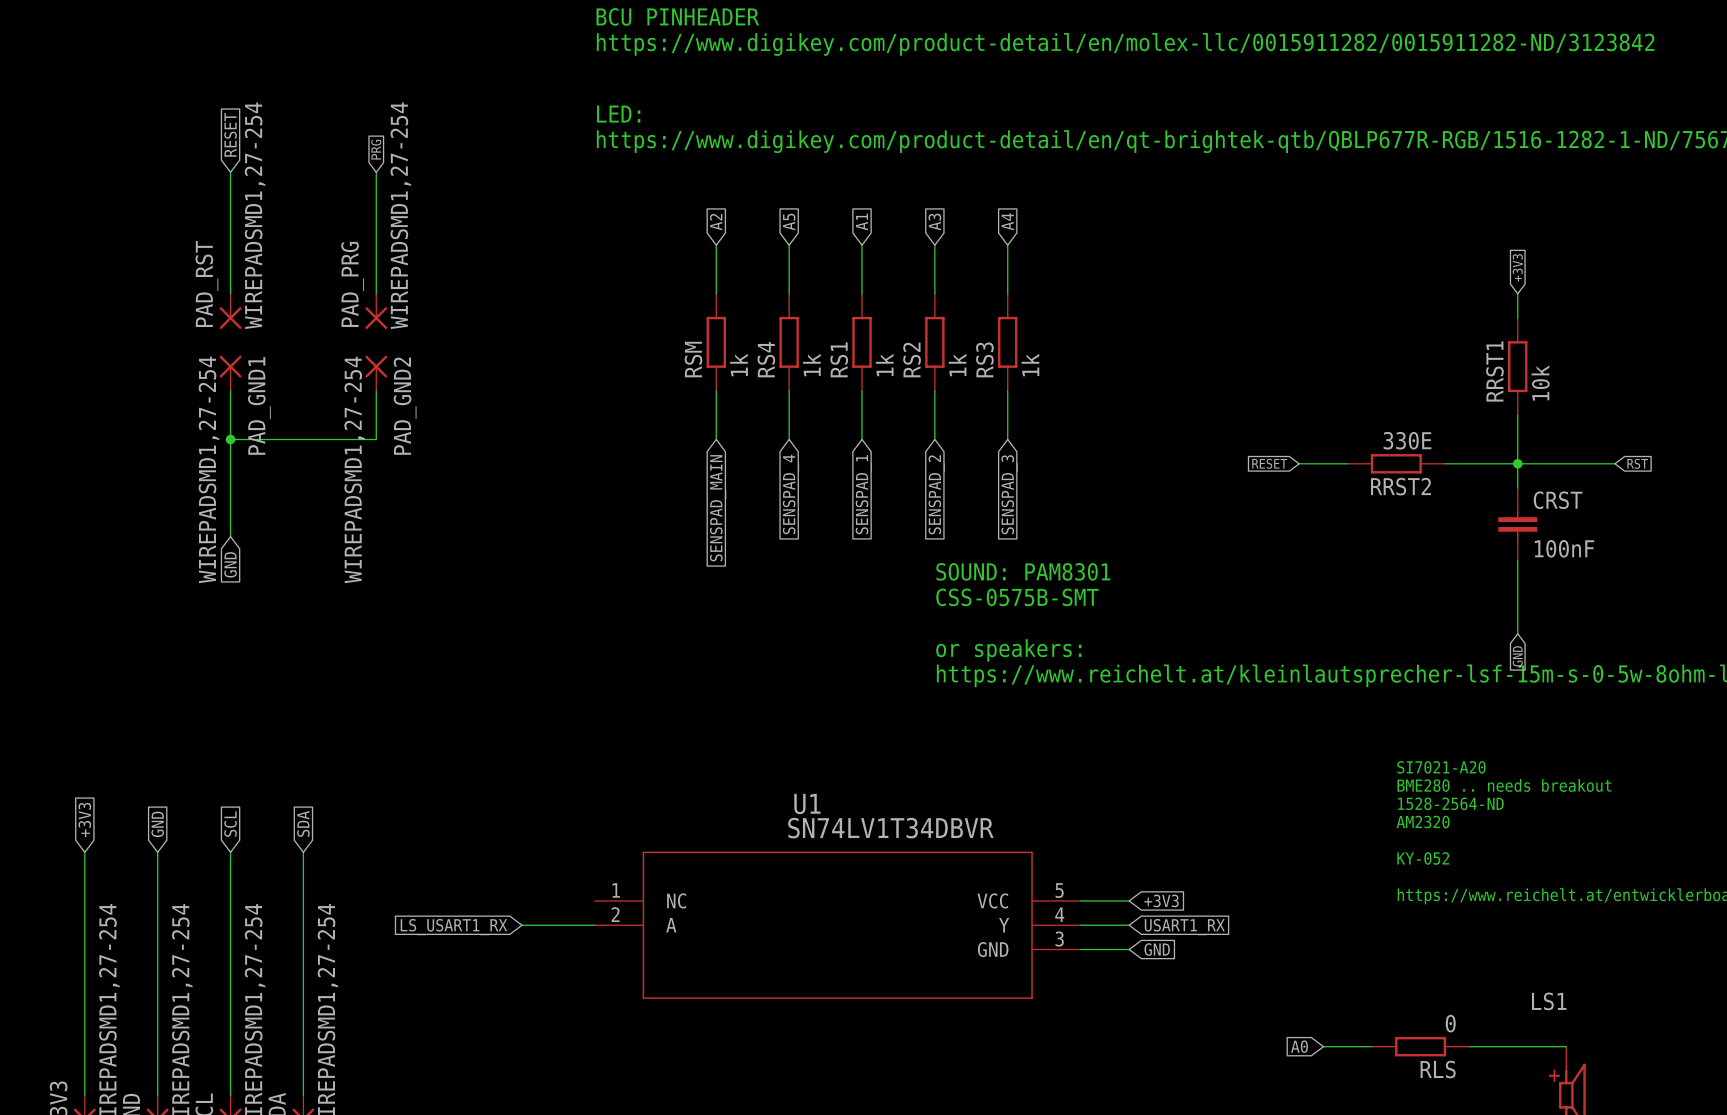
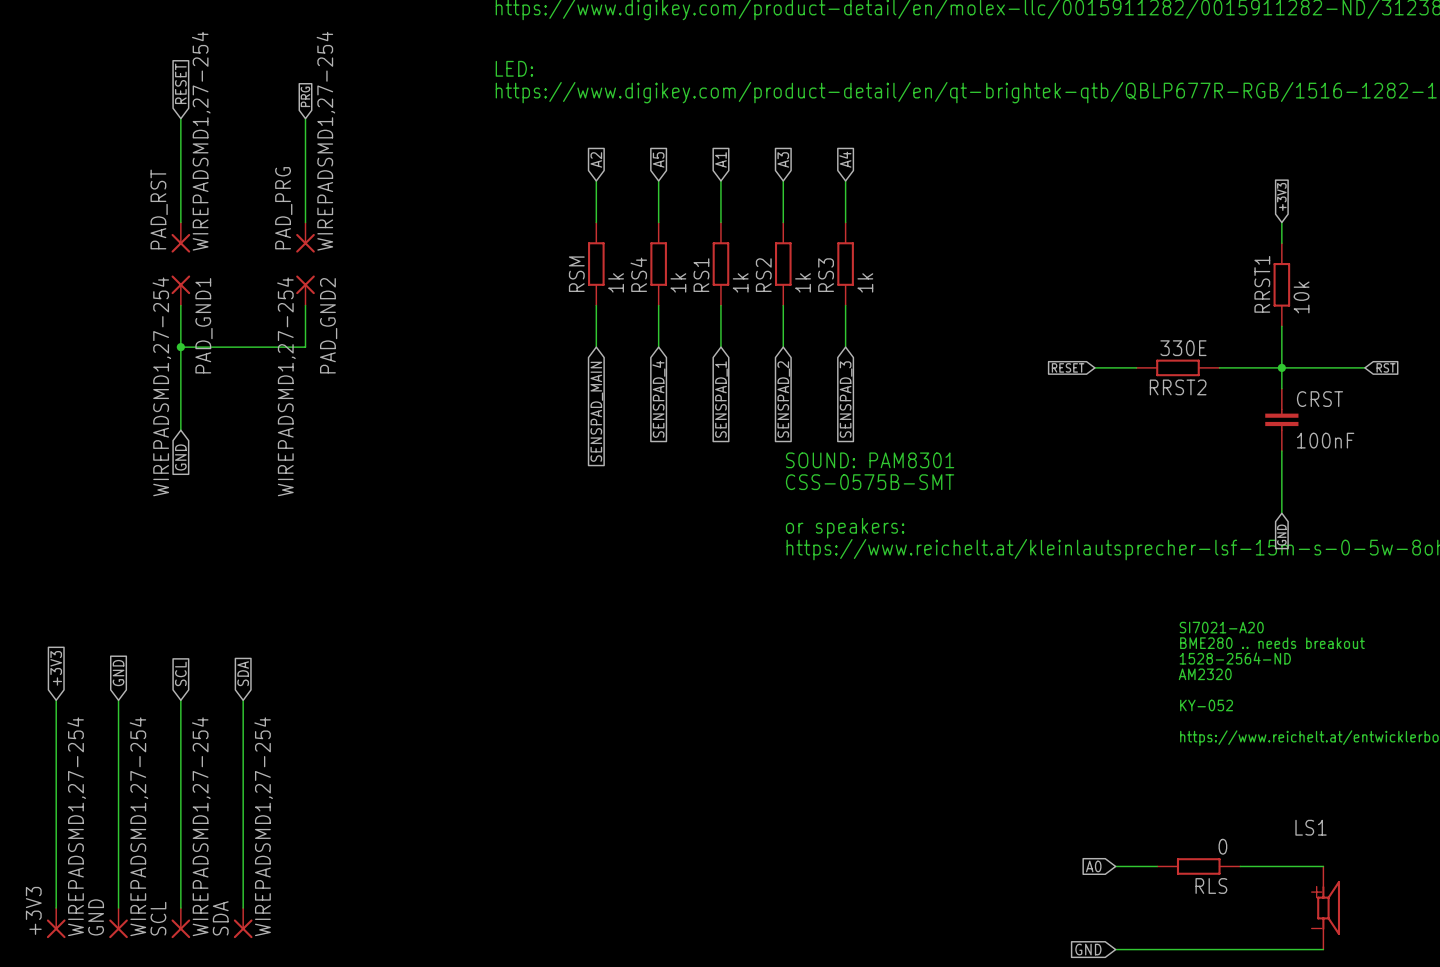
wire: (1080, 900) (1129, 900) -> none
global label: +3V3 (1161, 900) -> none
wire: (521, 925) (594, 925) -> none
U1: SN74LV1T34DBVR (837, 925) -> none
wire: (1080, 925) (1129, 925) -> none
global label: LS_USART1_RX (453, 927) -> none
global label: USART1_RX (1184, 927) -> none
wire: (1080, 949) (1129, 949) -> none
global label: GND (1157, 949) -> none

